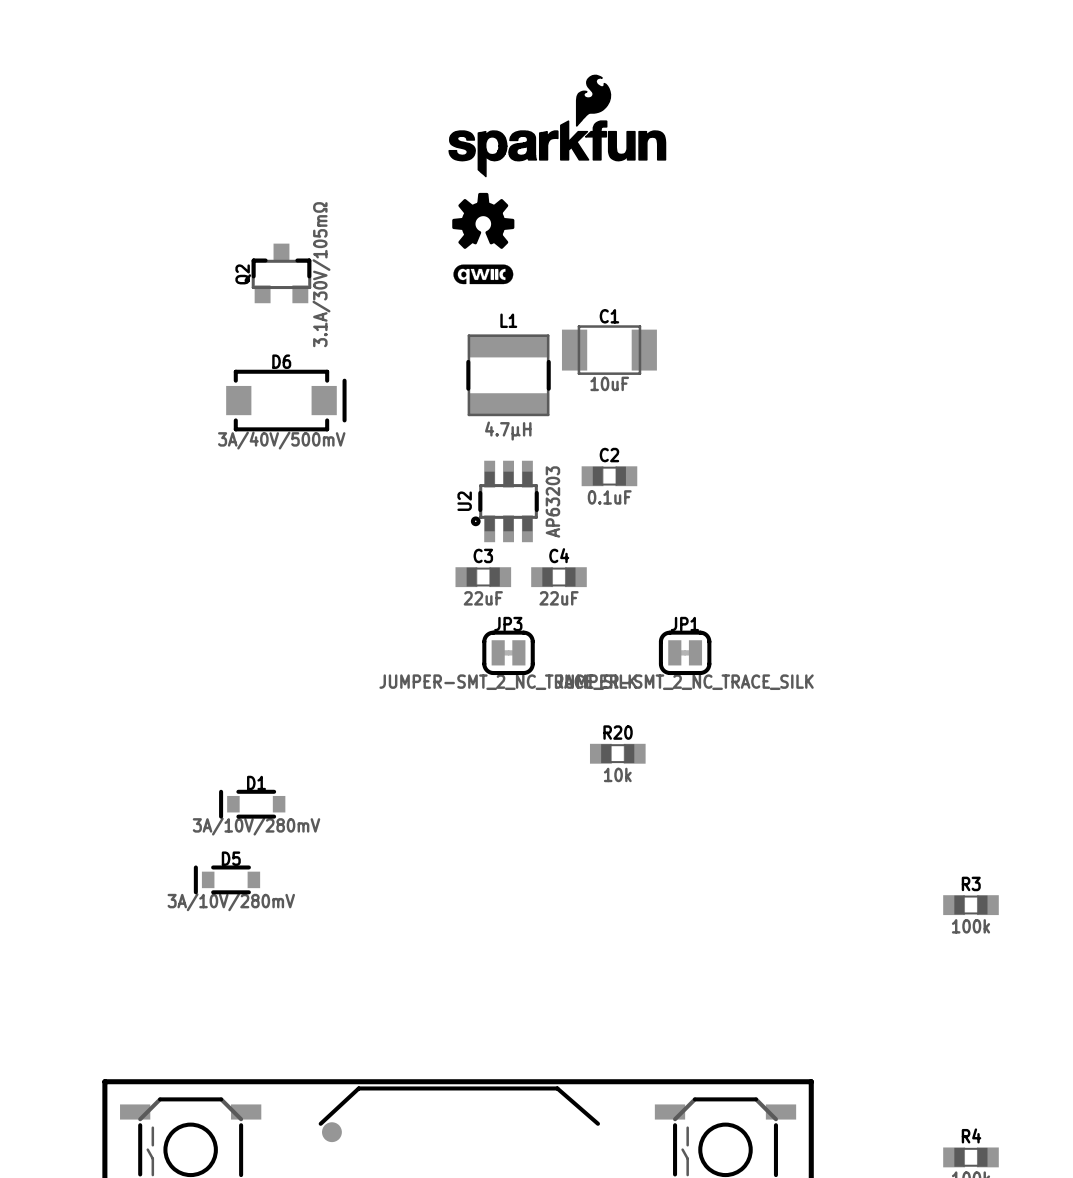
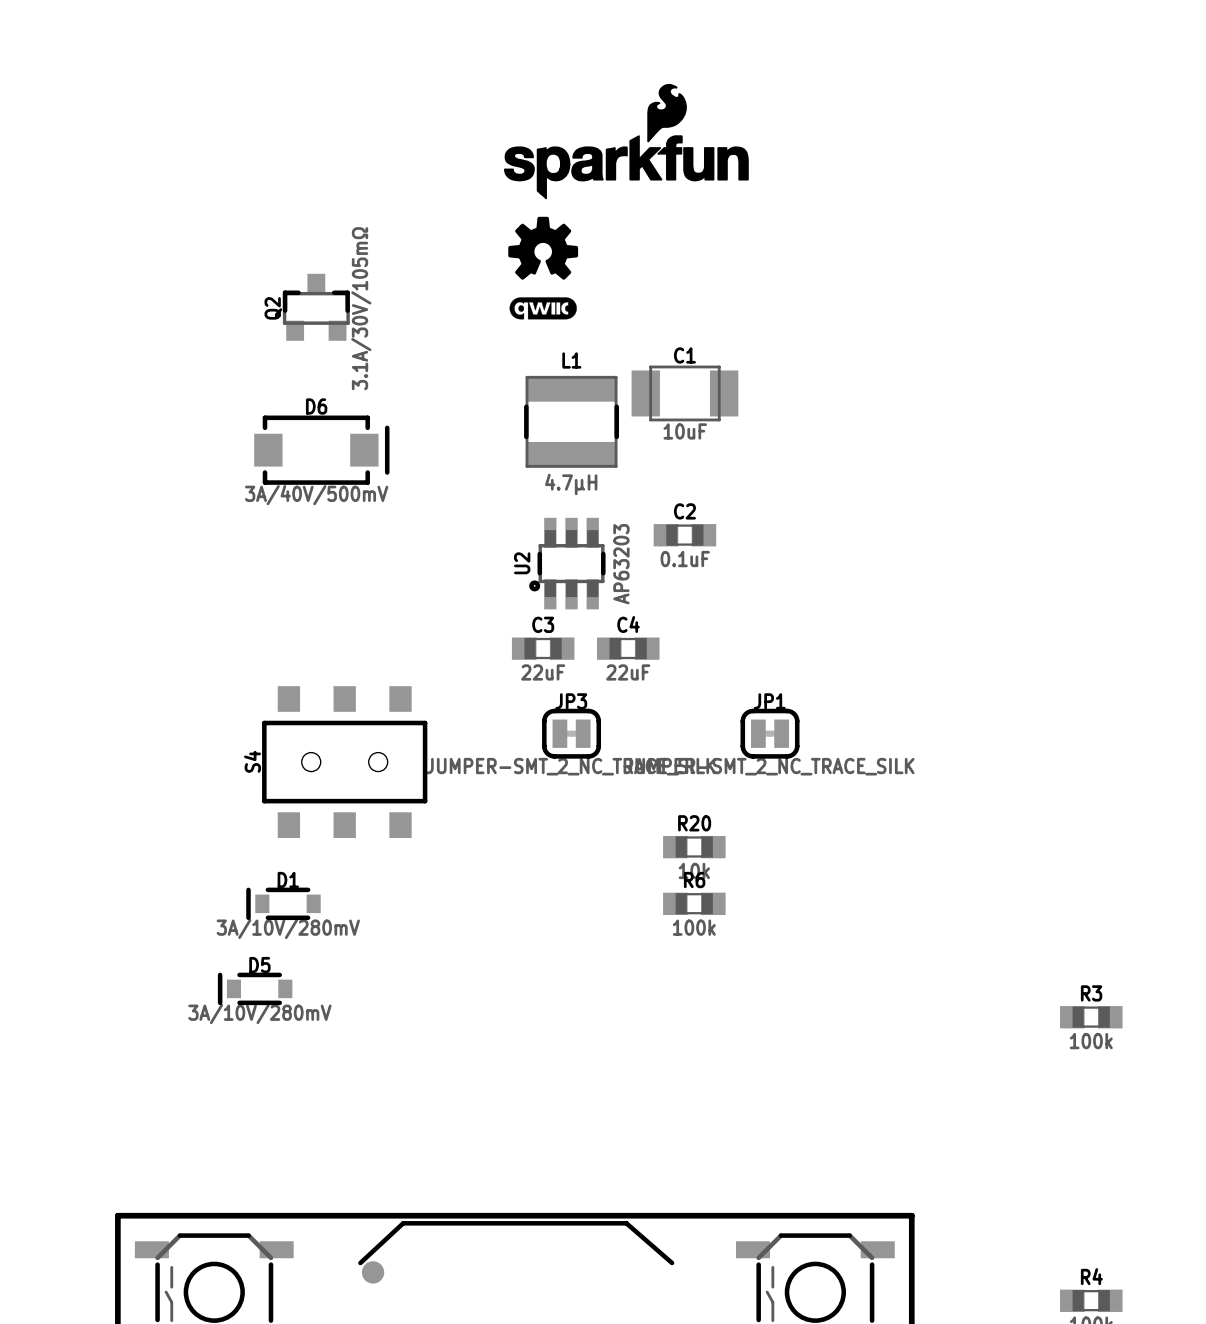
S4: none -> (344, 762)
R6: none -> 100k (694, 903)

